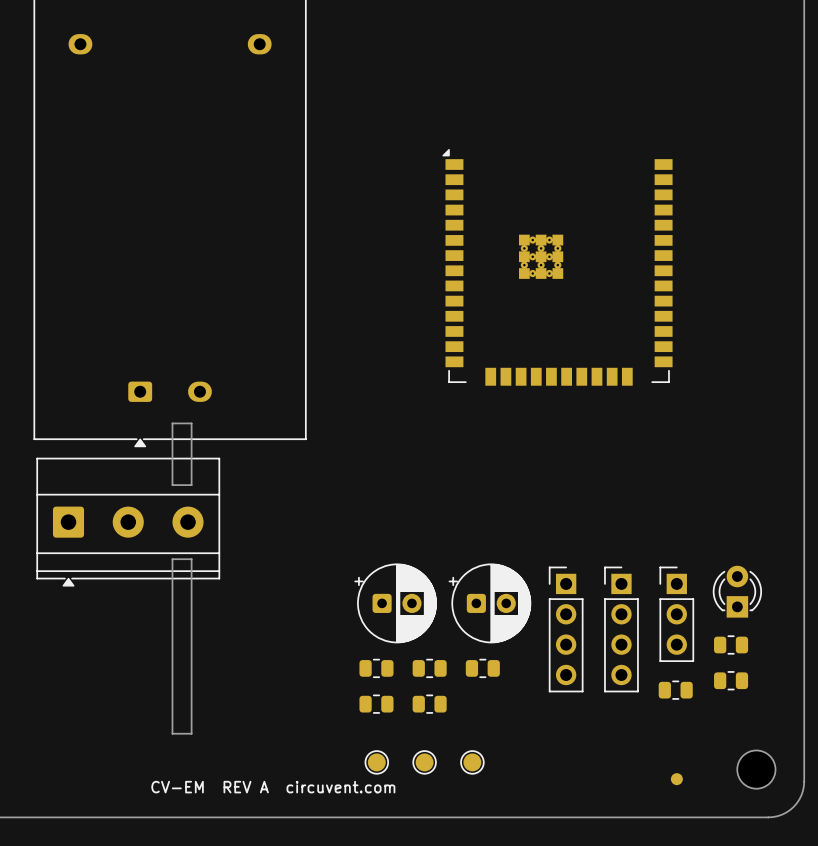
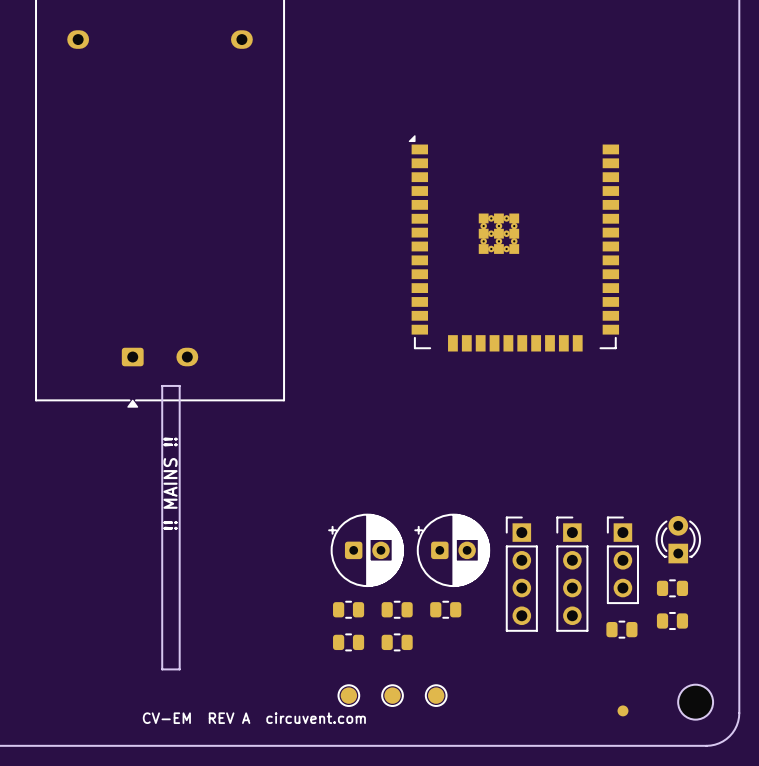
board edge: (172, 485) (191, 485) -> (162, 442) (162, 509)
part: (128, 522) -> none
text: none -> !! MAINS !! (170, 483)
board edge: (172, 559) (191, 559) -> (179, 442) (179, 509)

